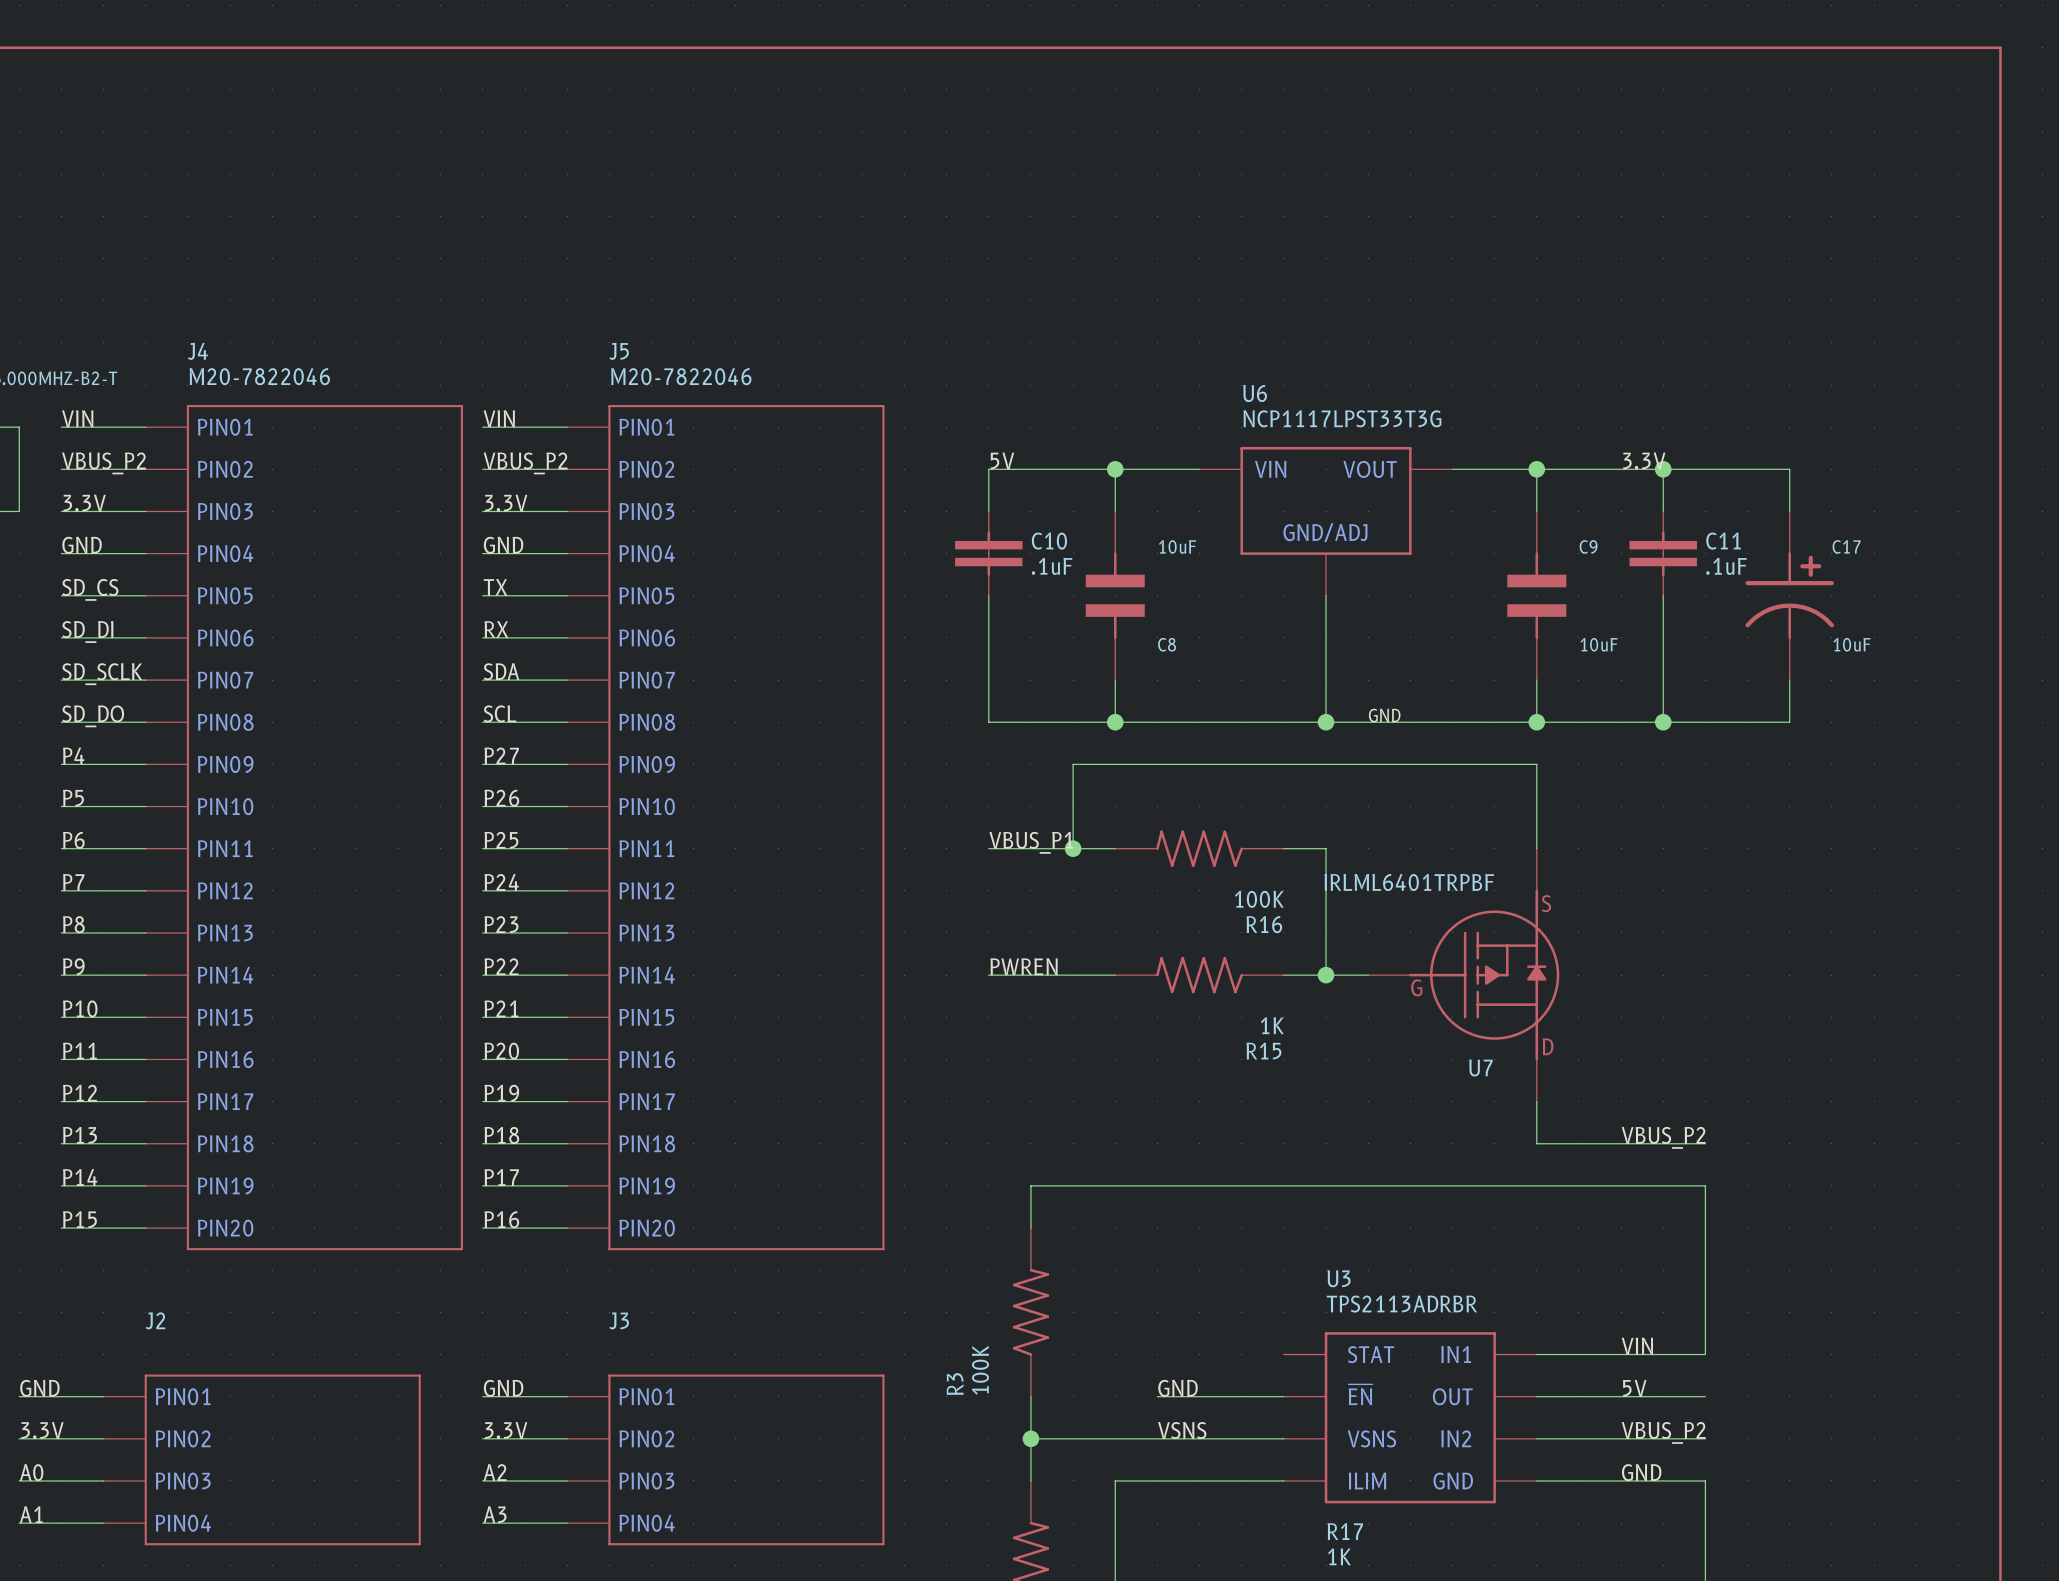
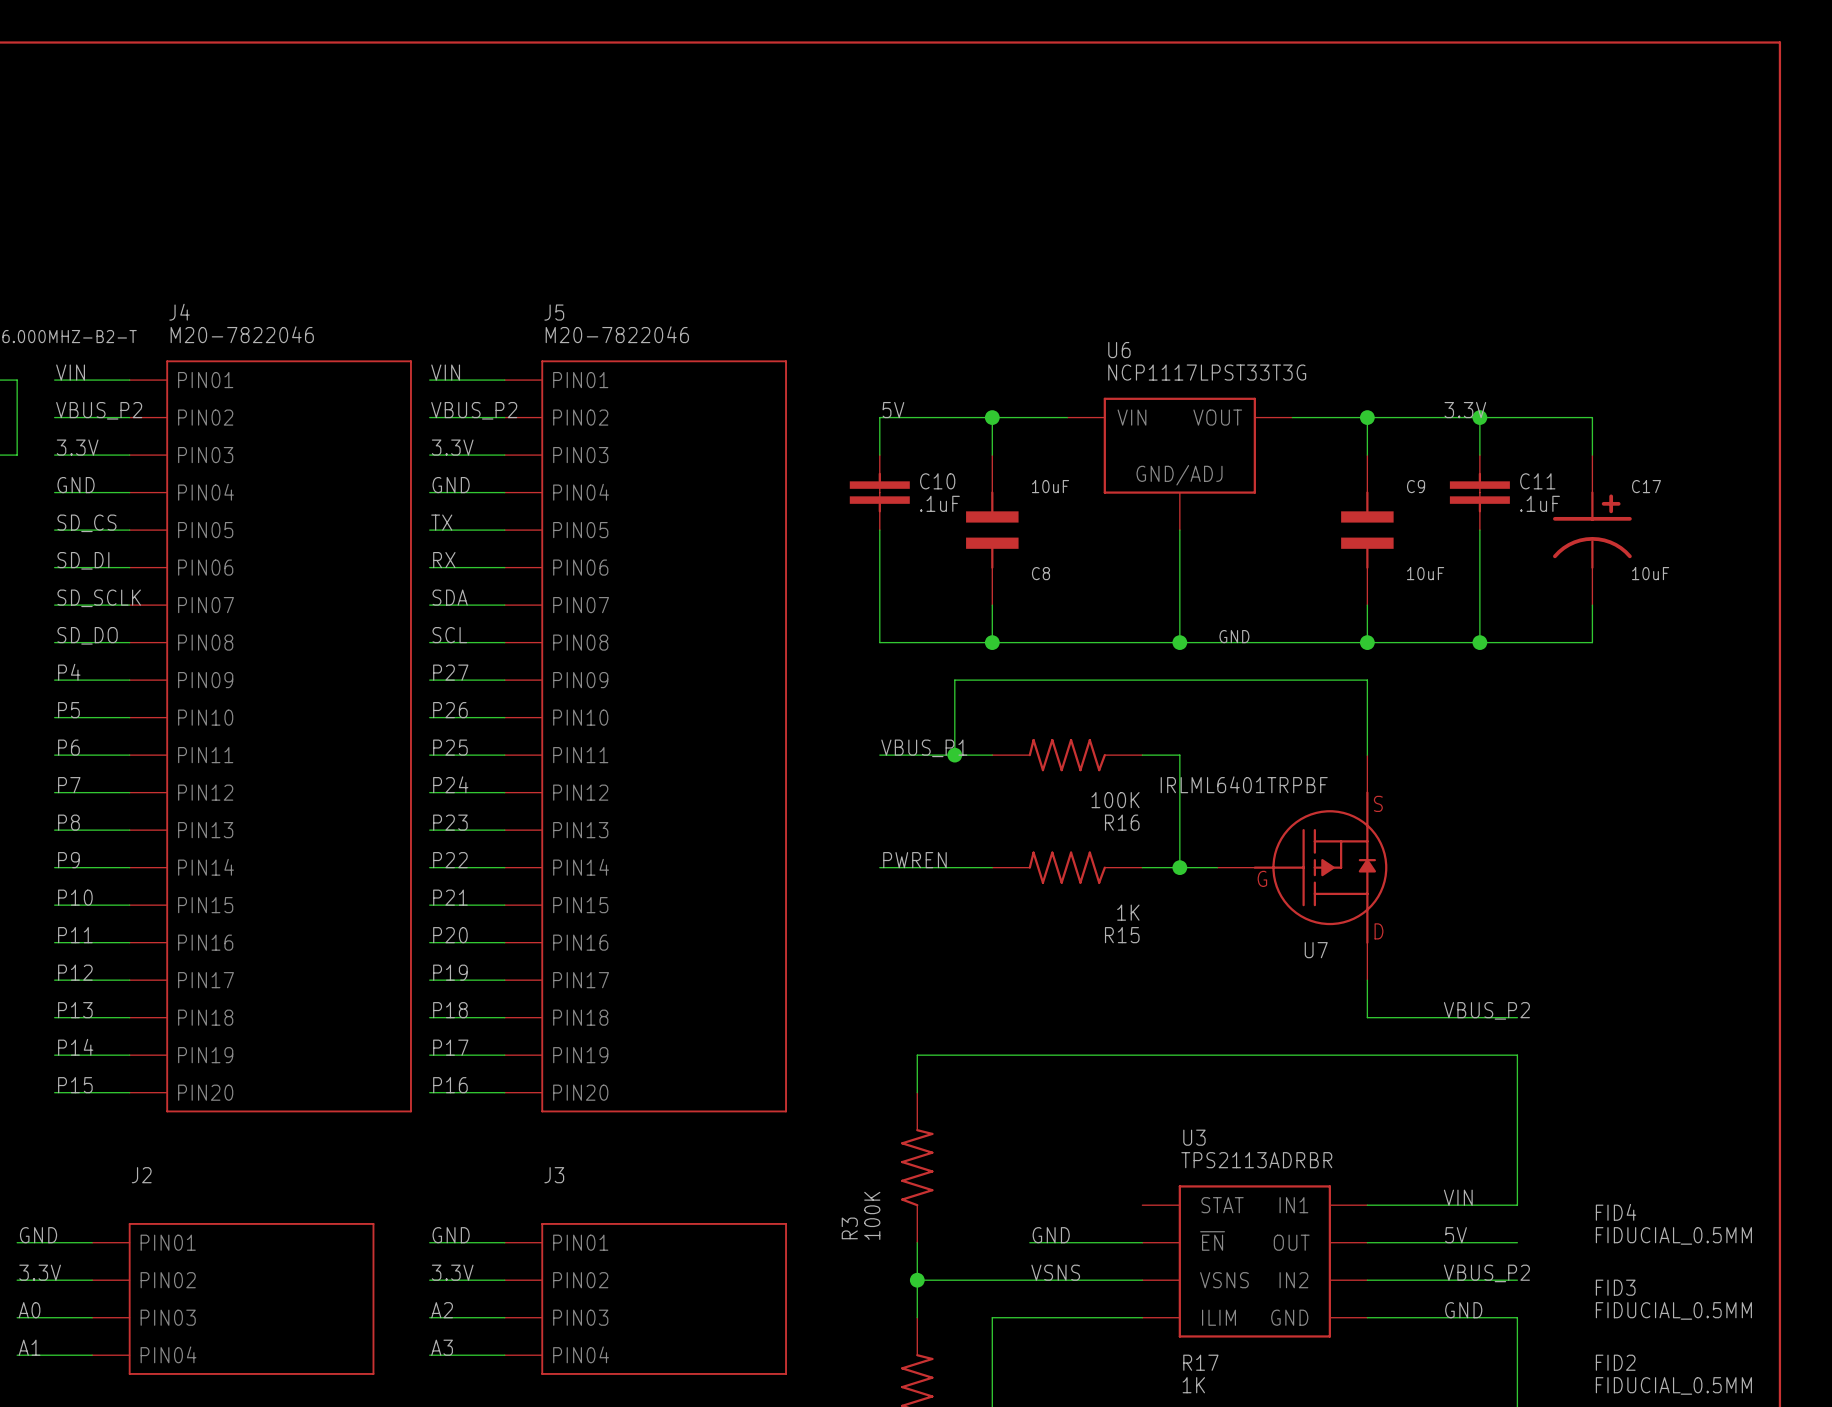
FID4: none -> FIDUCIAL_0.5MM (1673, 1224)
FID3: none -> FIDUCIAL_0.5MM (1673, 1299)
FID2: none -> FIDUCIAL_0.5MM (1673, 1374)

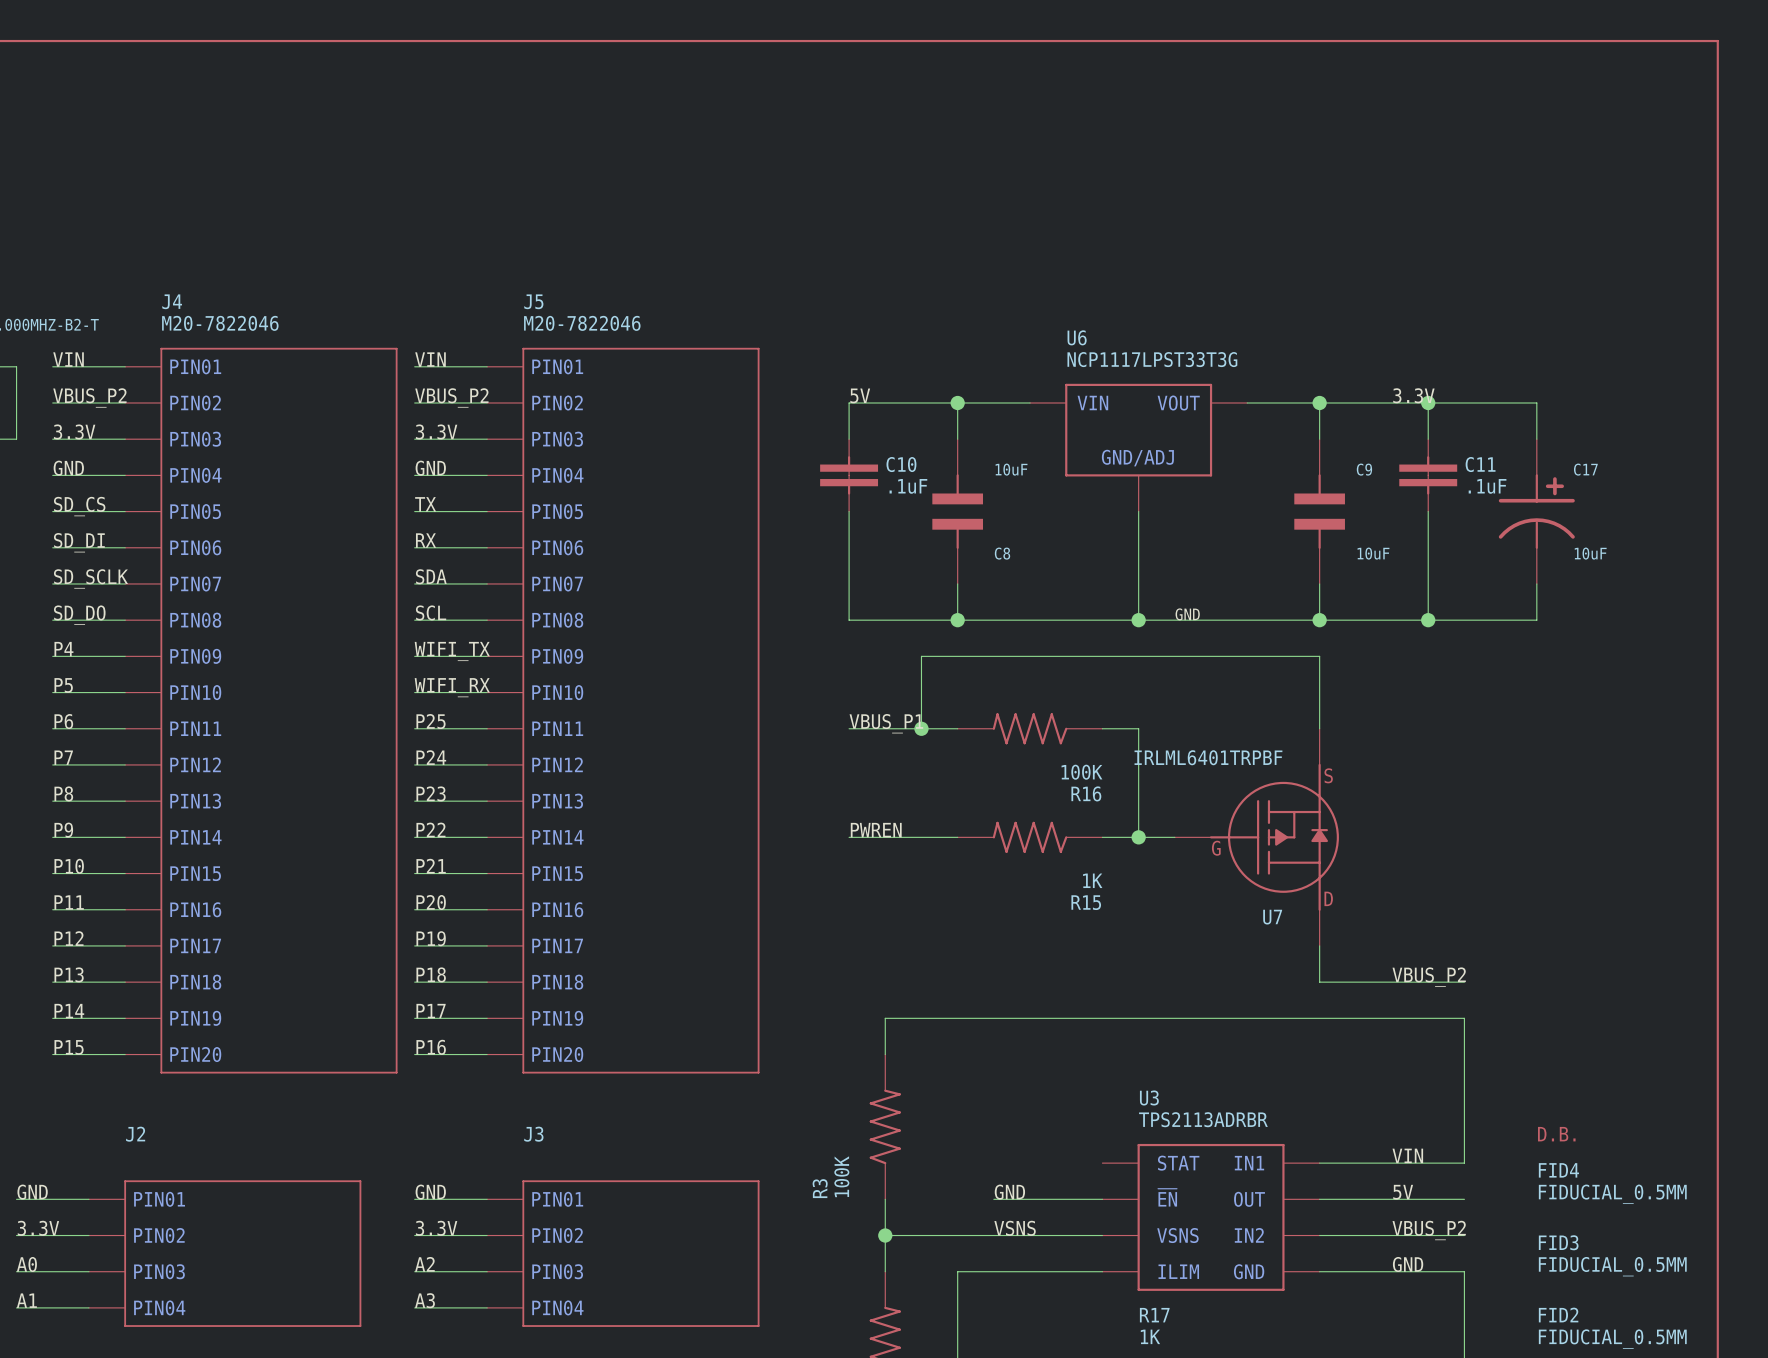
label: P27 (450, 672) -> WIFI_TX (452, 651)
label: P26 (450, 710) -> WIFI_RX (452, 687)
part: none -> (1556, 1134)

